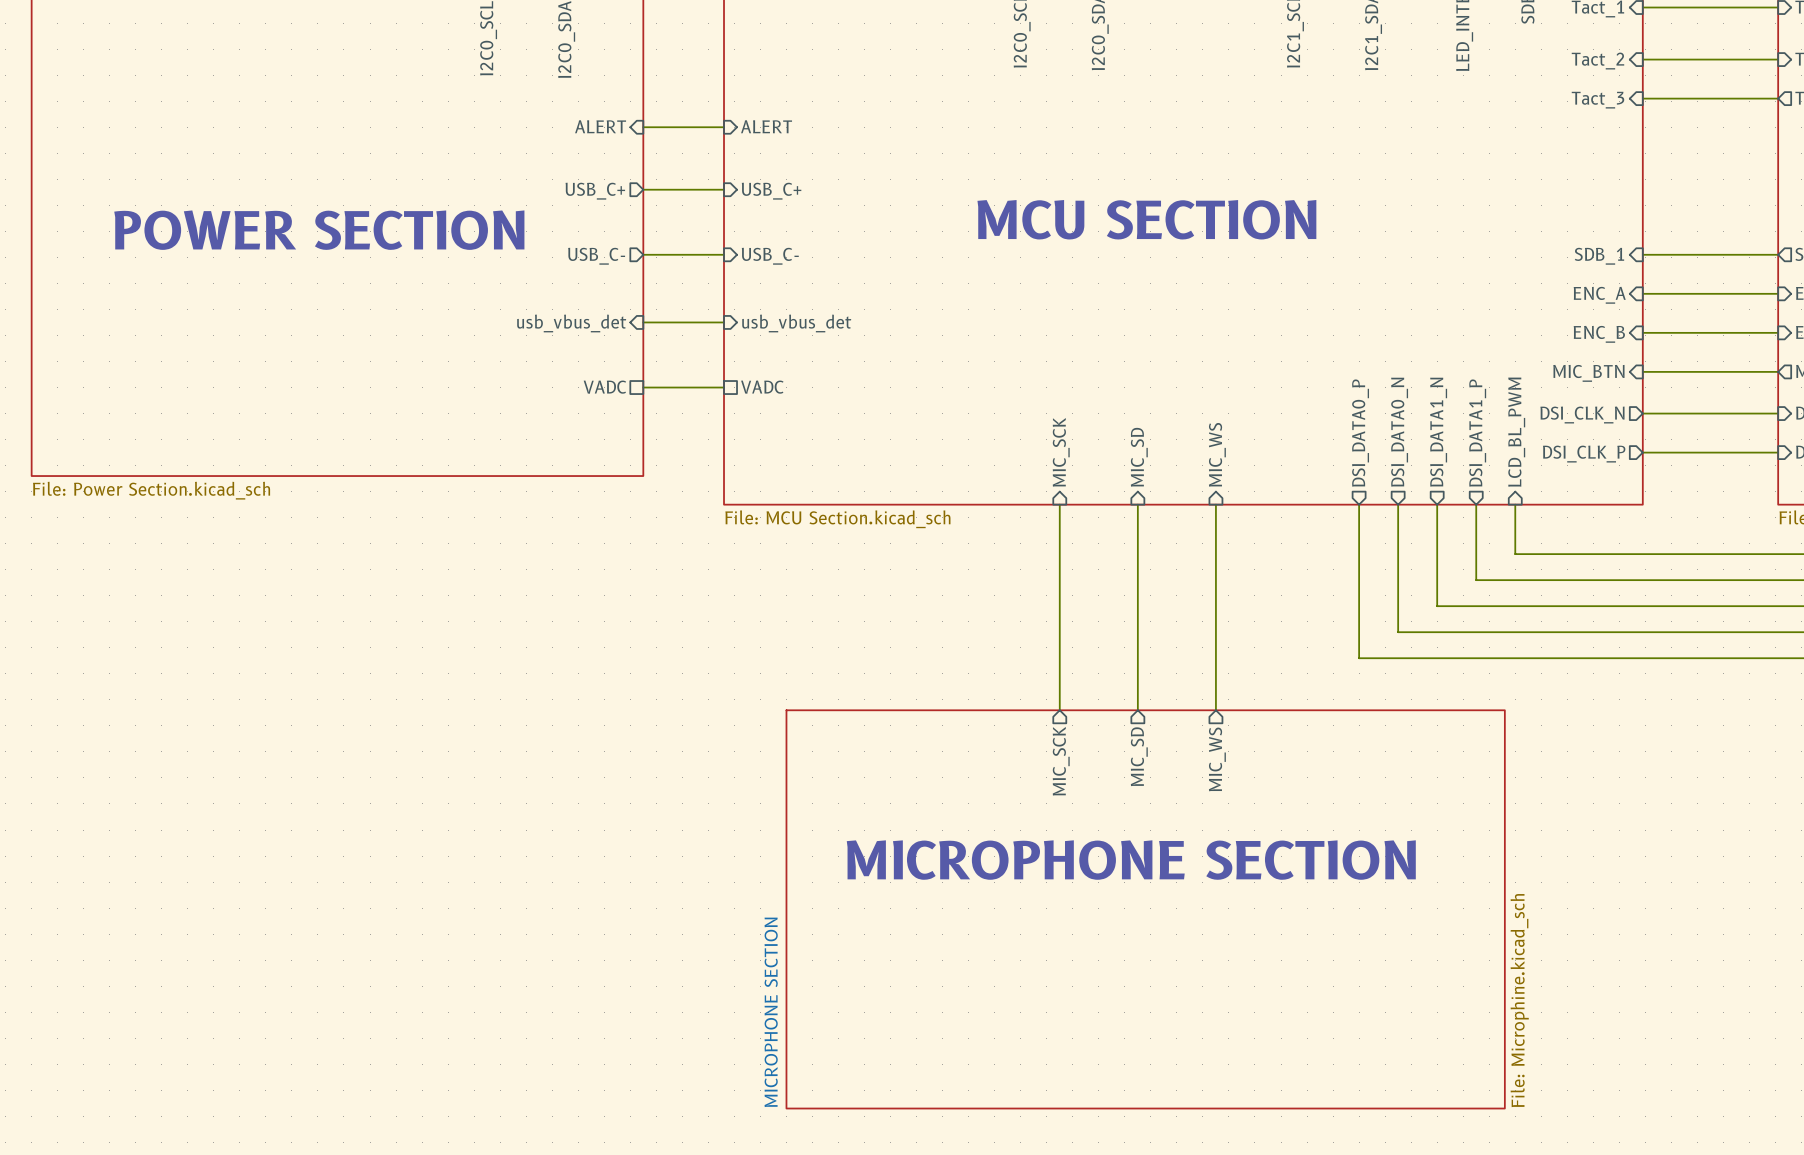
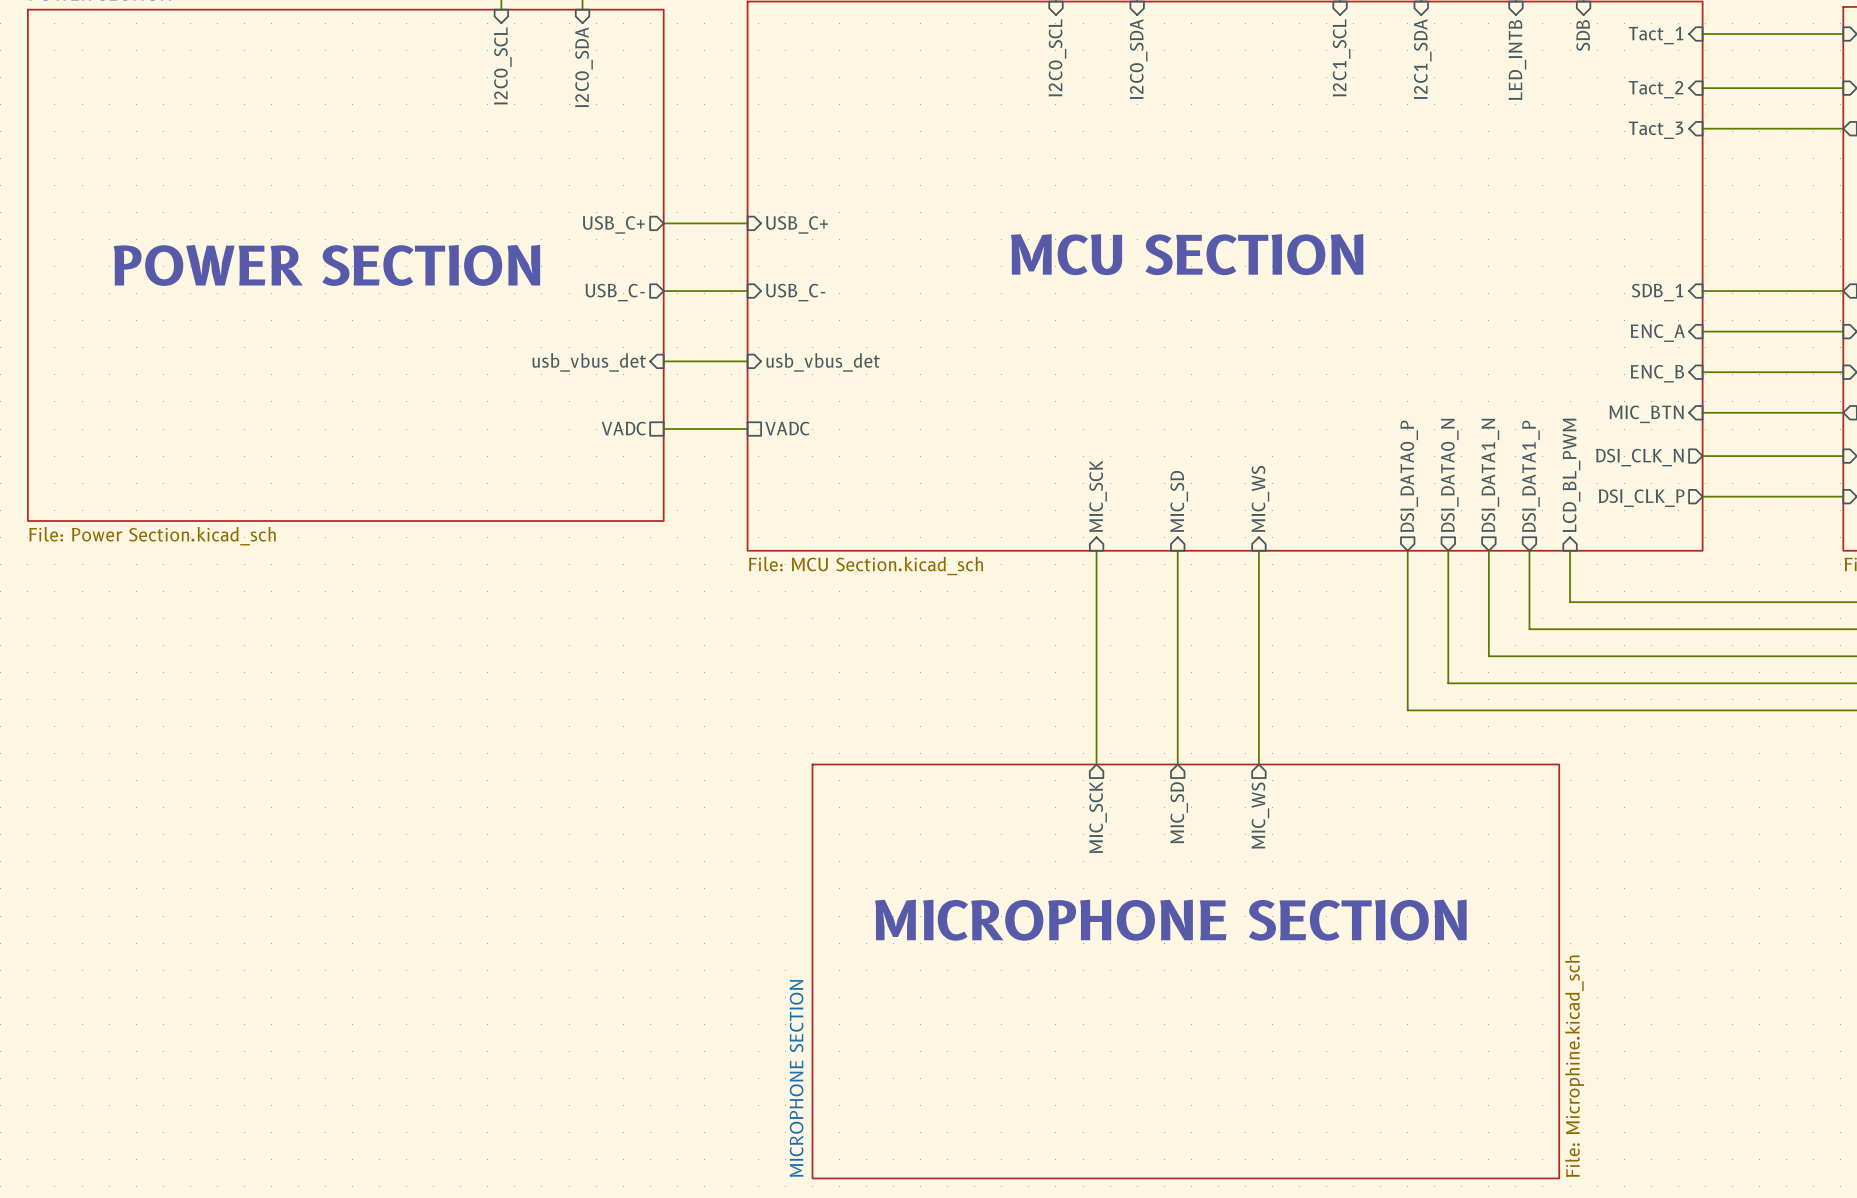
sheet pin: ALERT (600, 126) -> none
sheet pin: ALERT (766, 126) -> none
wire: (643, 127) (724, 127) -> none

